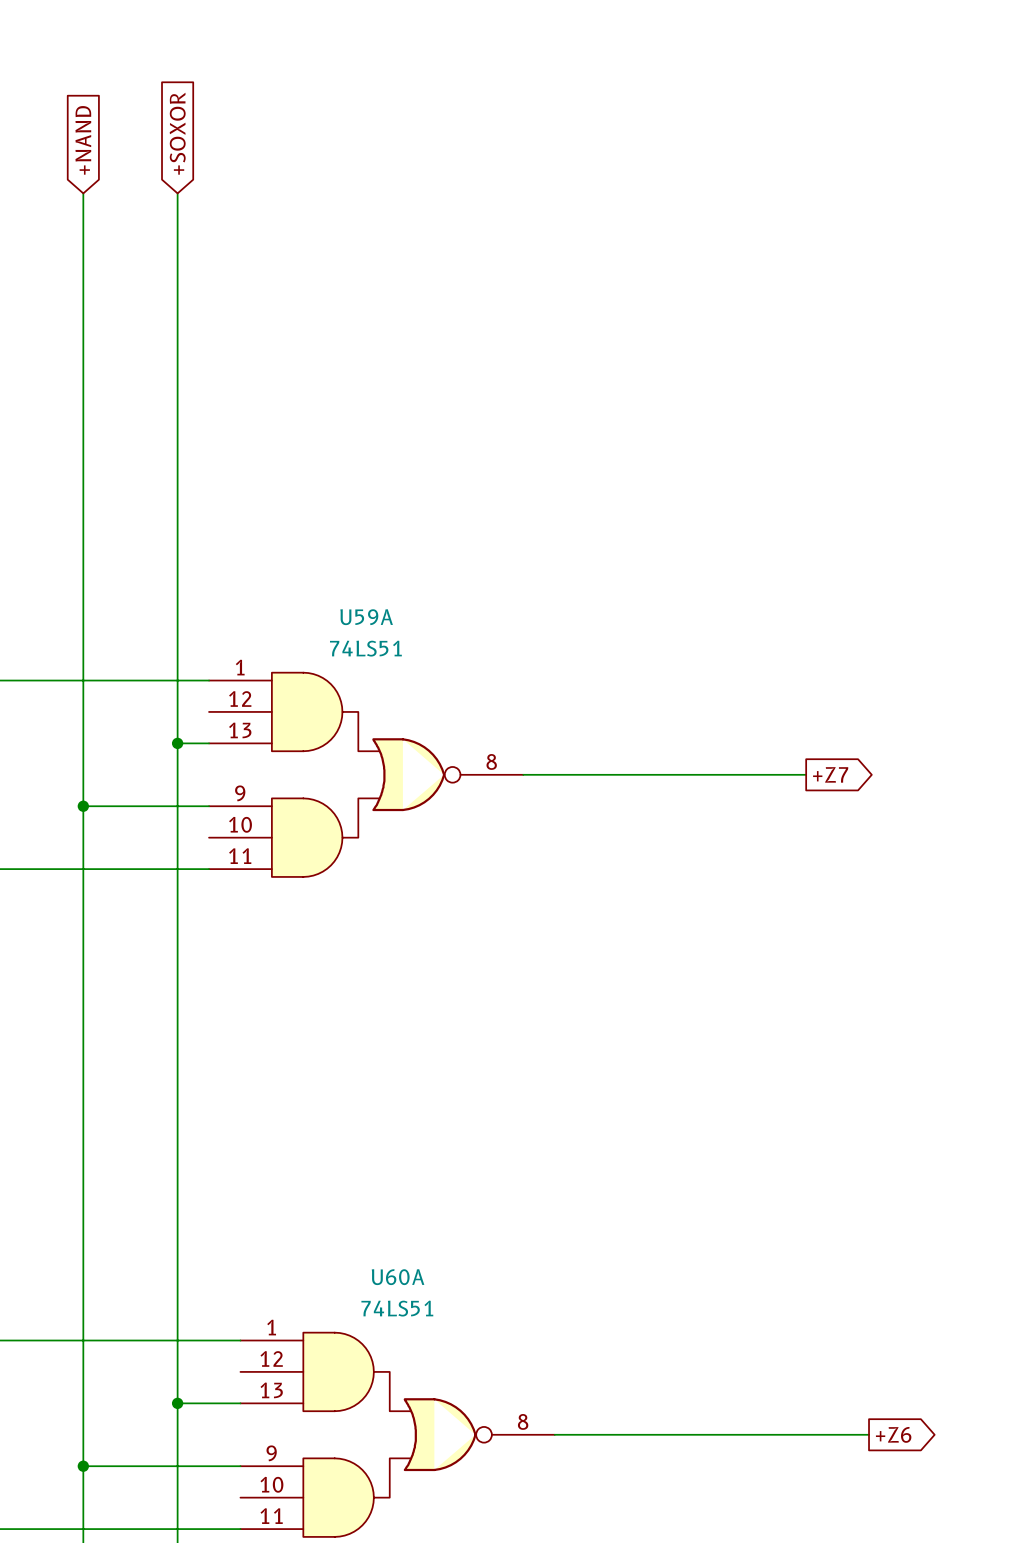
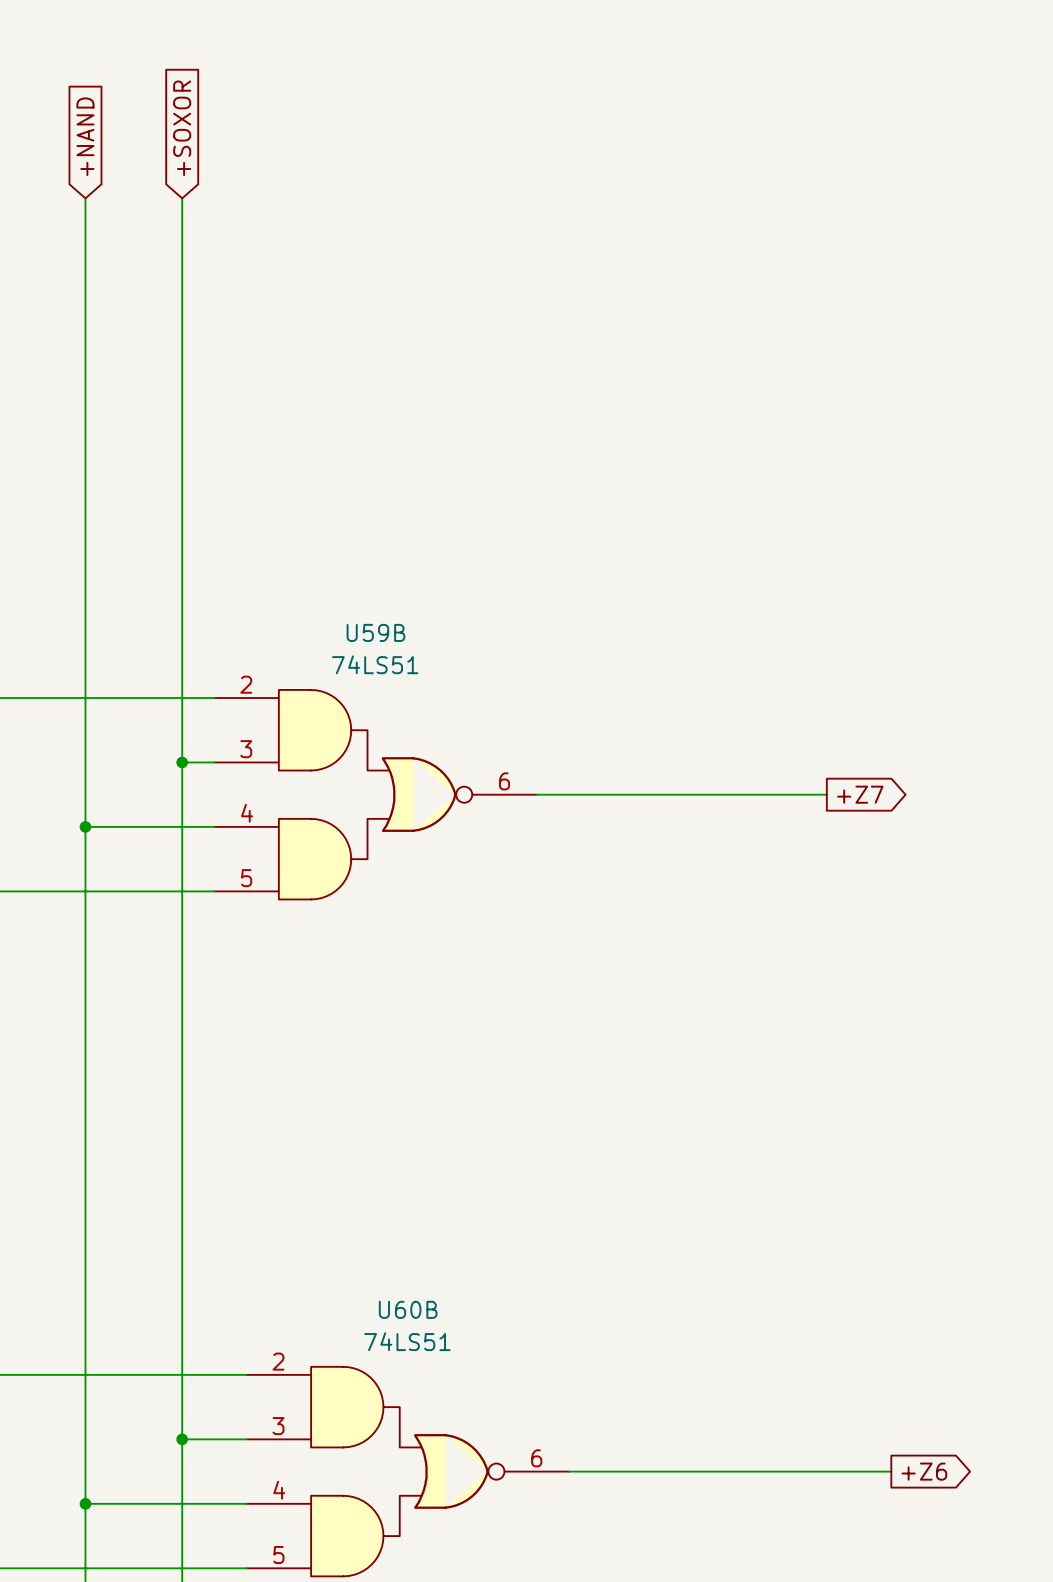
U59A: 74LS51 (366, 774) -> none
U59B: none -> 74LS51 (375, 794)
U60A: 74LS51 (397, 1434) -> none
U60B: none -> 74LS51 (407, 1471)

